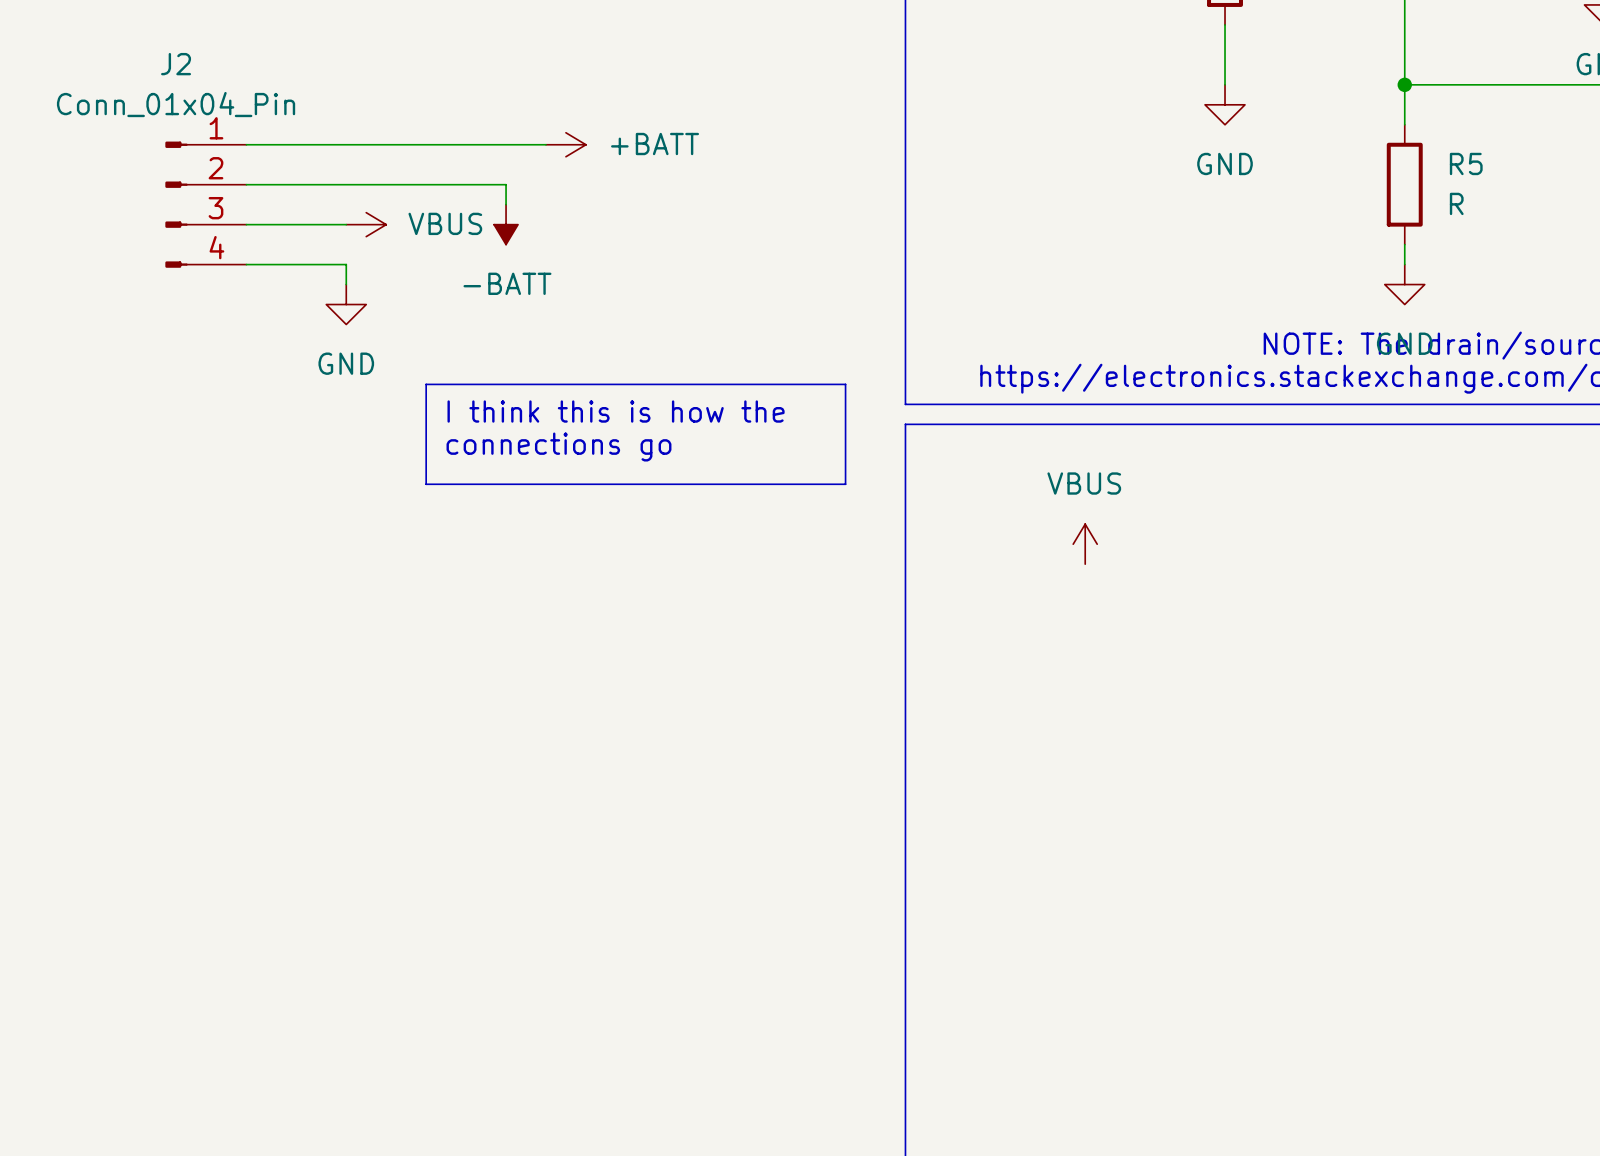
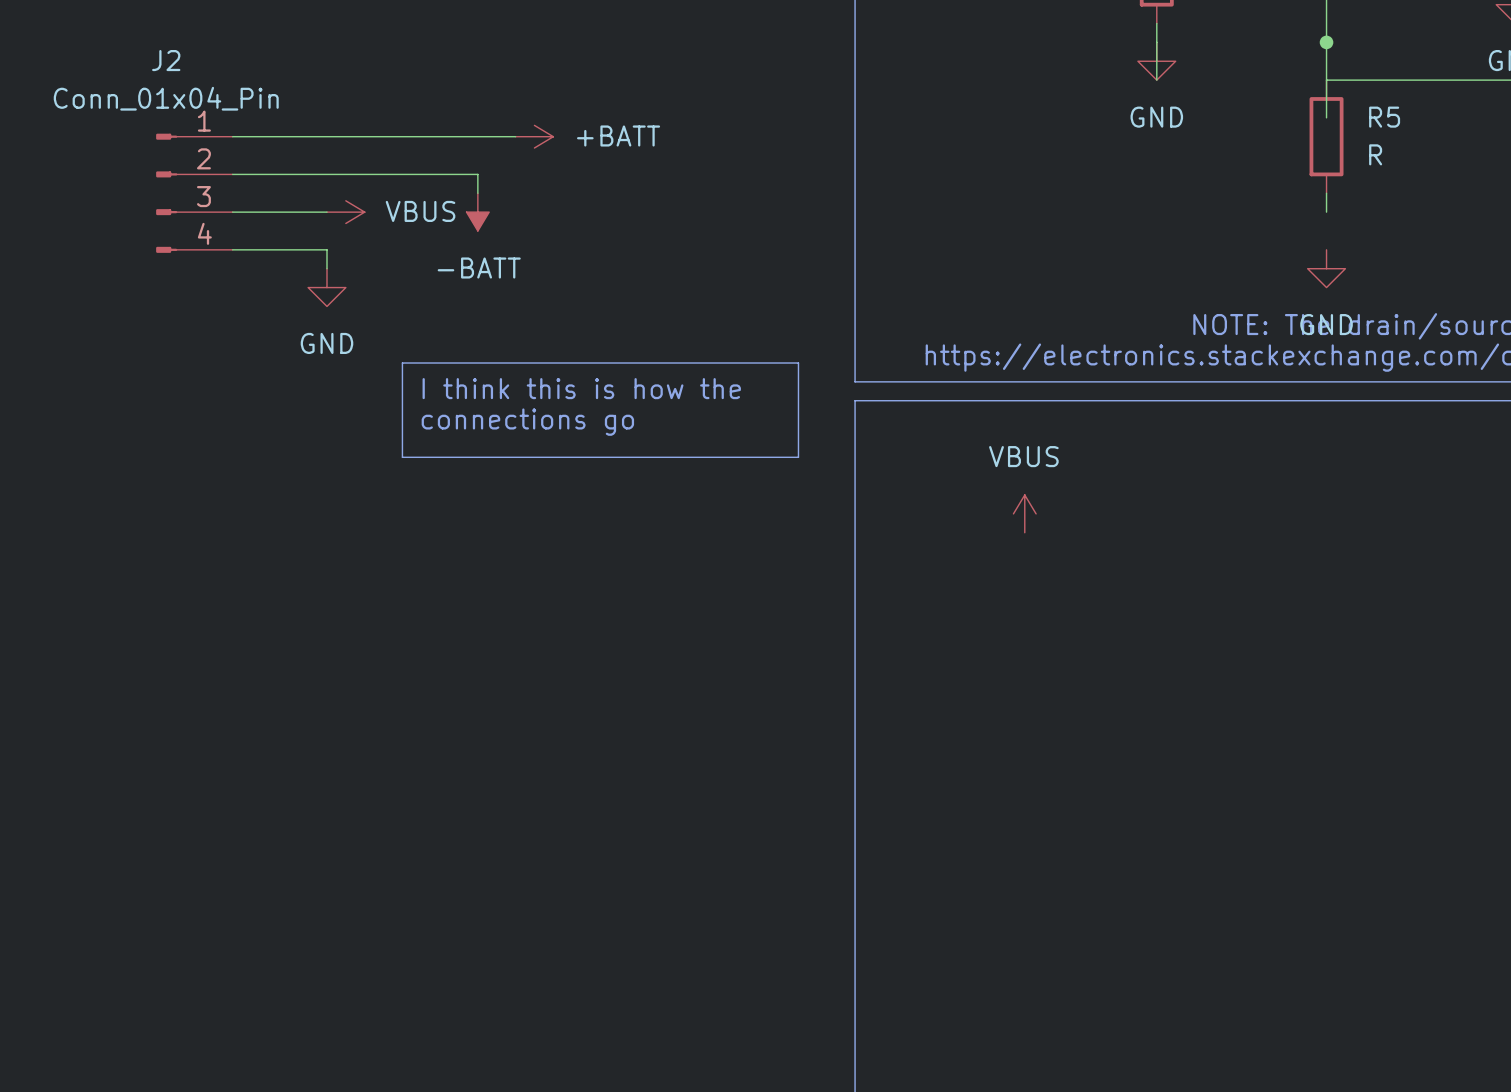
junction position: (1404, 84) -> (1326, 42)
power symbol position: GND (1225, 104) -> GND (1156, 61)
R5 position: (1404, 184) -> (1326, 136)
wire: (1404, 244) (1404, 264) -> (1326, 193) (1326, 212)

